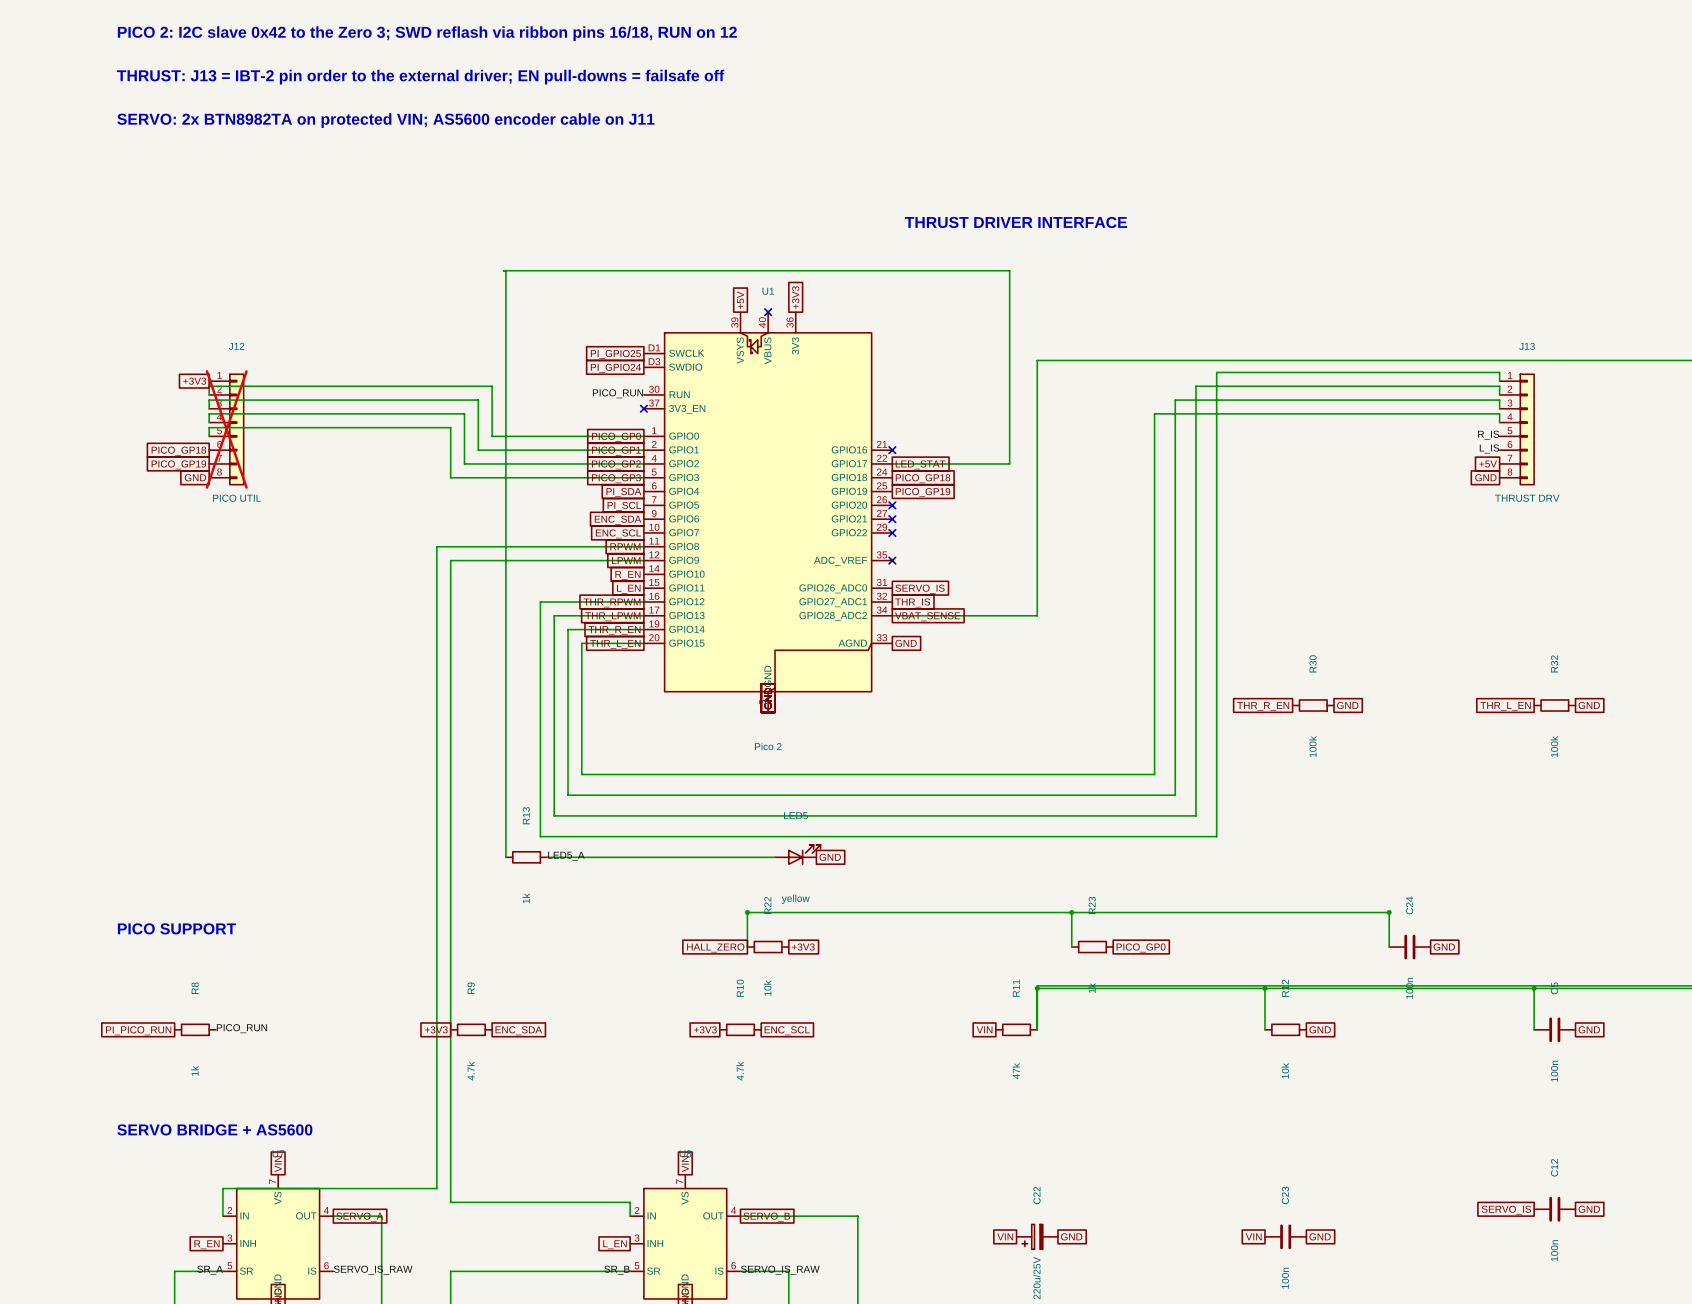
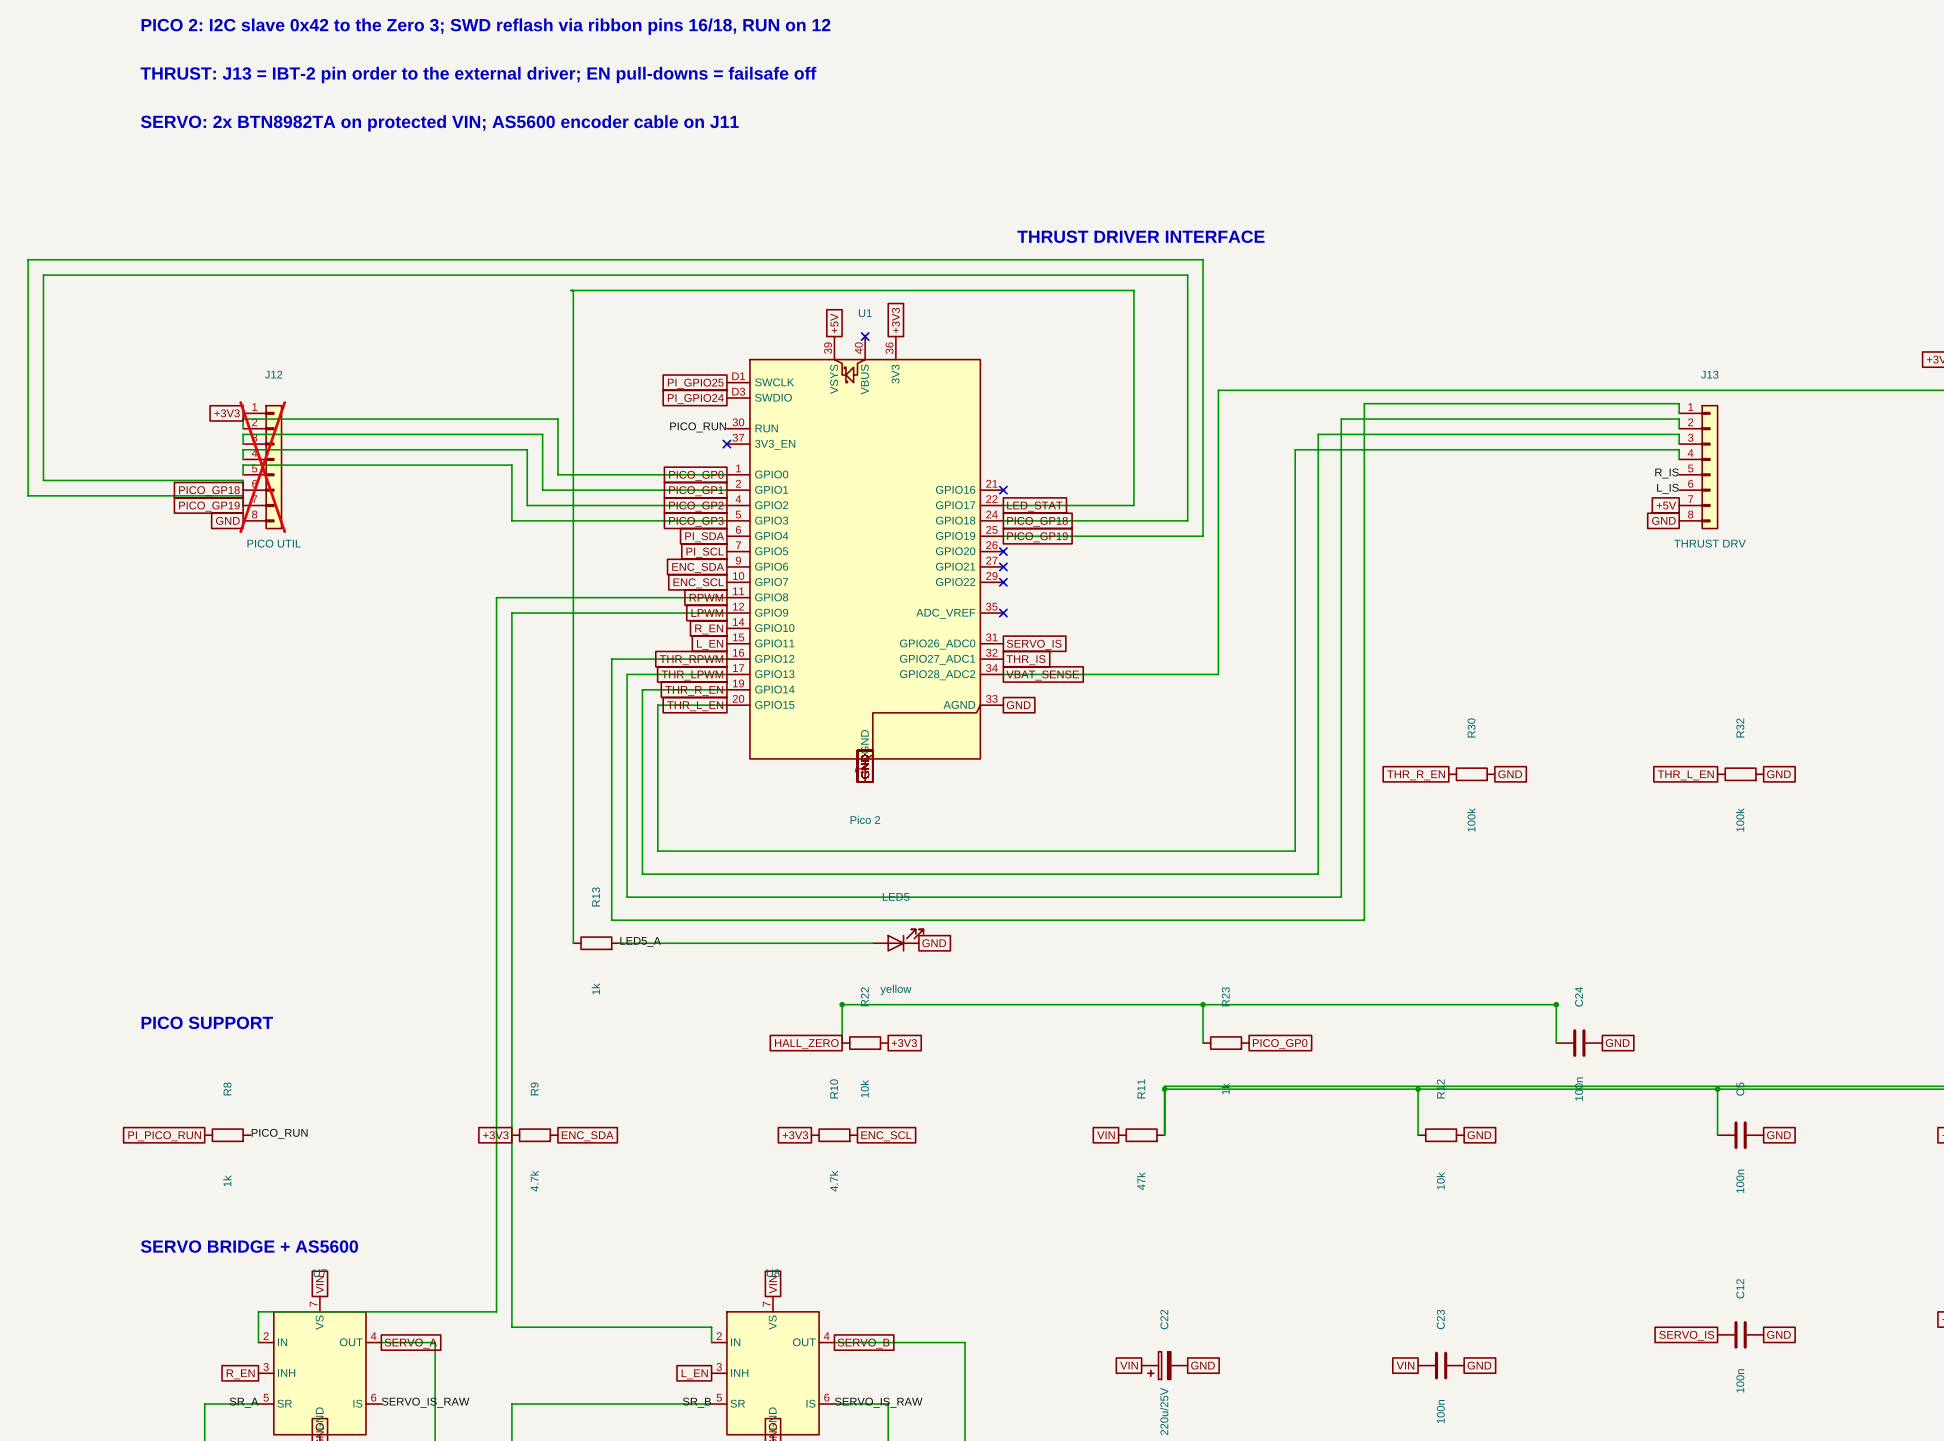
wire: (1085, 360) (1037, 360) (1037, 615) -> (1218, 390) (1218, 674) (1164, 674)
wire: none -> (243, 490) (243, 480) (43, 480) (43, 275) (1187, 275) (1187, 520) (1003, 520)
wire: none -> (243, 505) (243, 495) (28, 495) (28, 259) (1203, 259) (1203, 536) (1003, 536)

